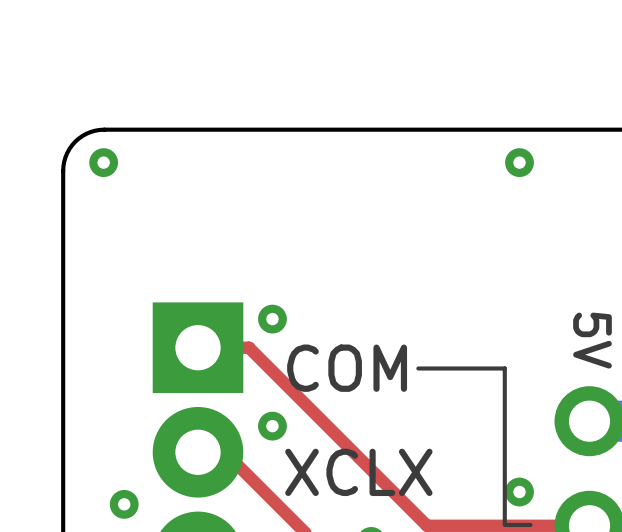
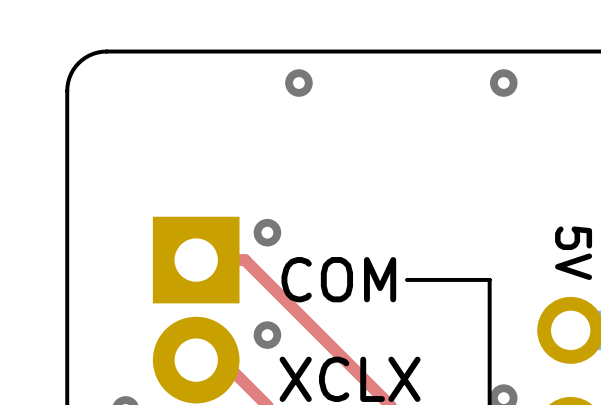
via position: (103, 162) -> (298, 83)

